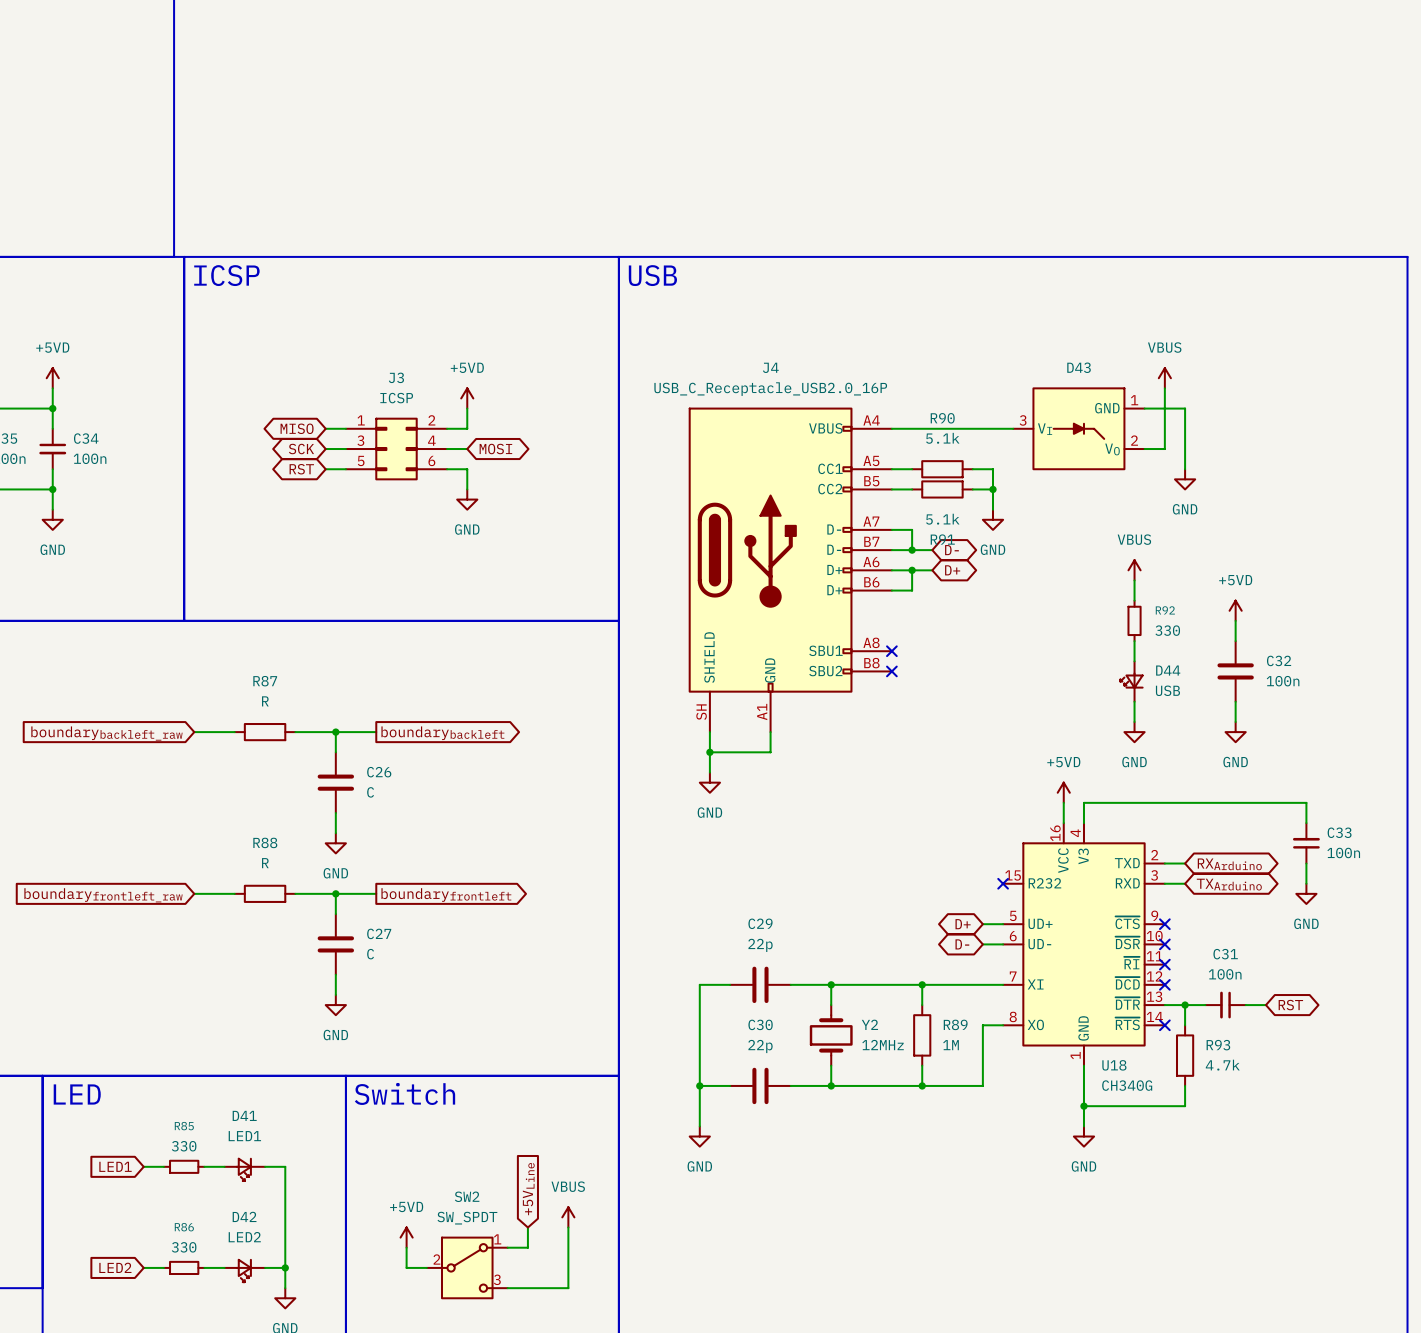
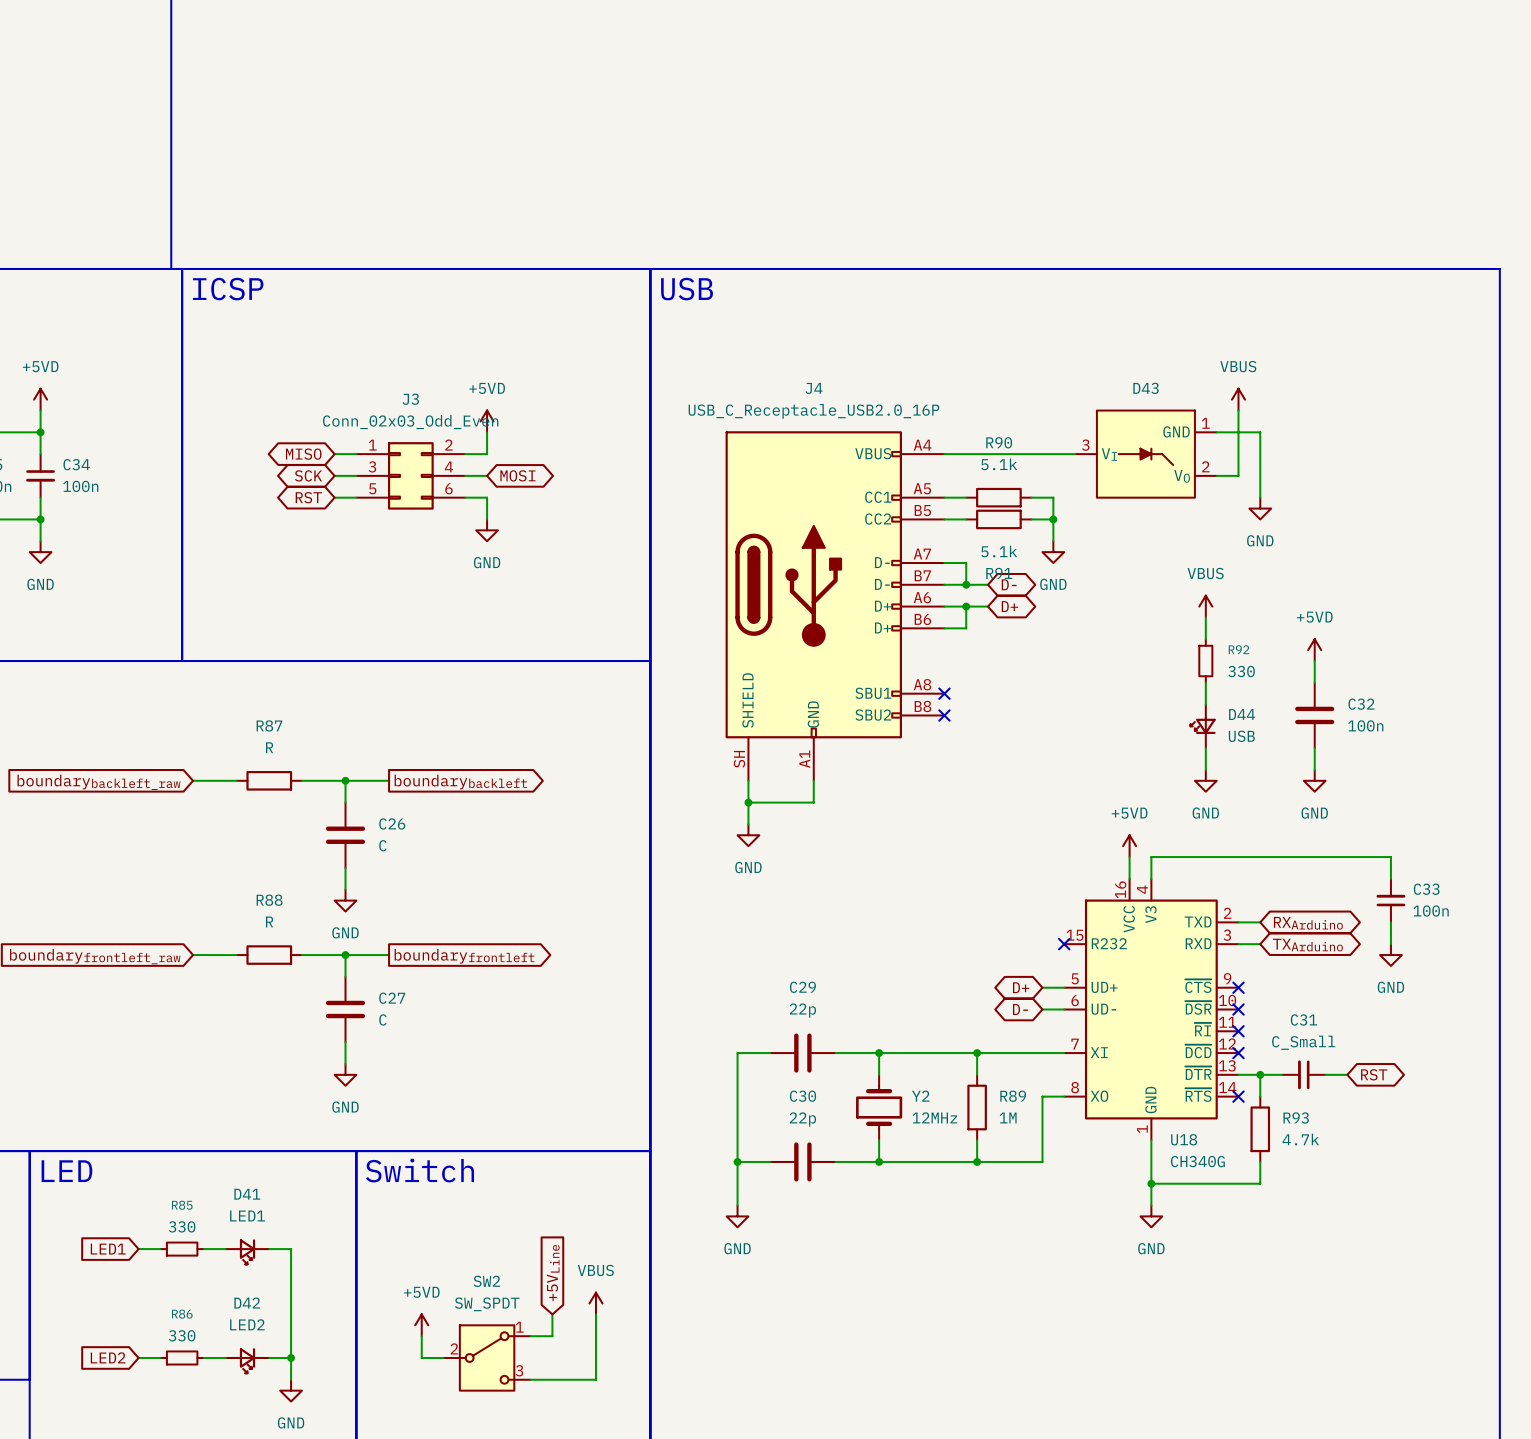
J3 value: ICSP (396, 398) -> Conn_02x03_Odd_Even (410, 422)
C31 value: 100n (1225, 974) -> C_Small (1303, 1042)

